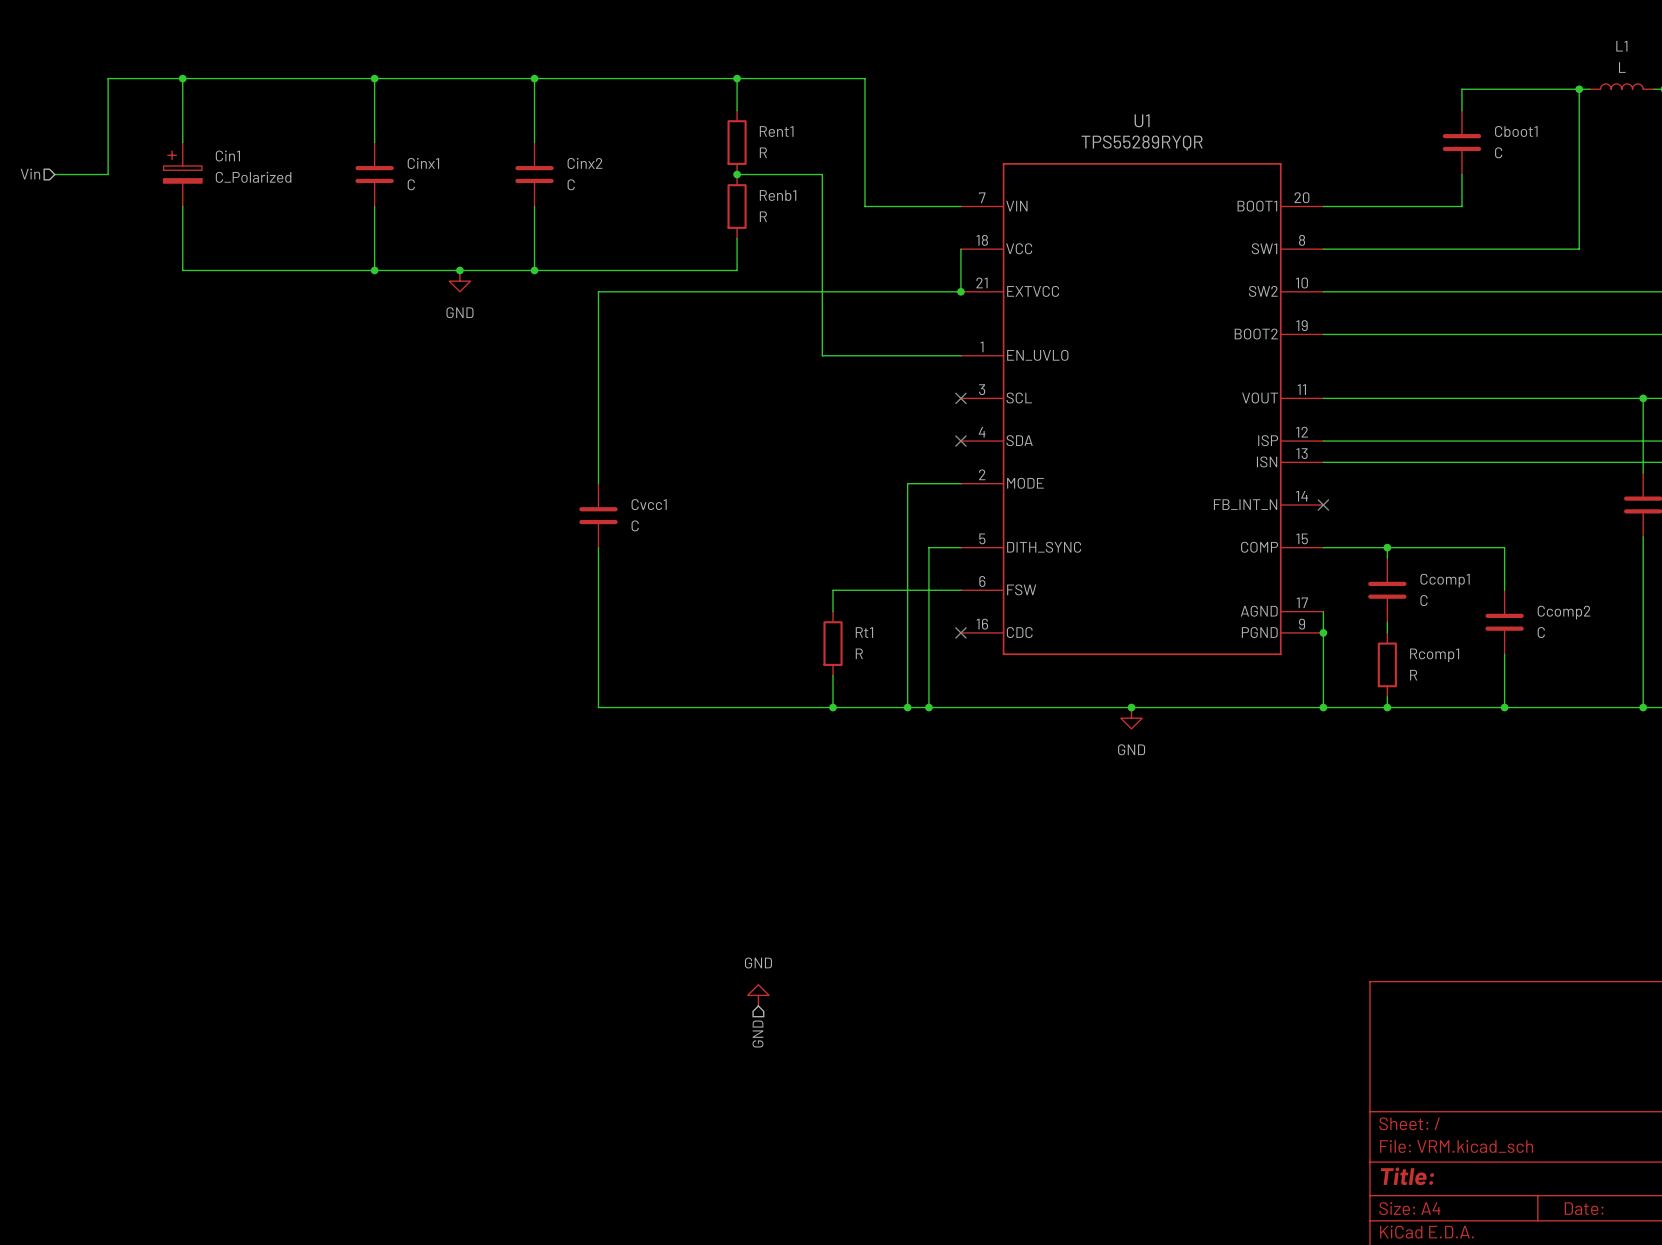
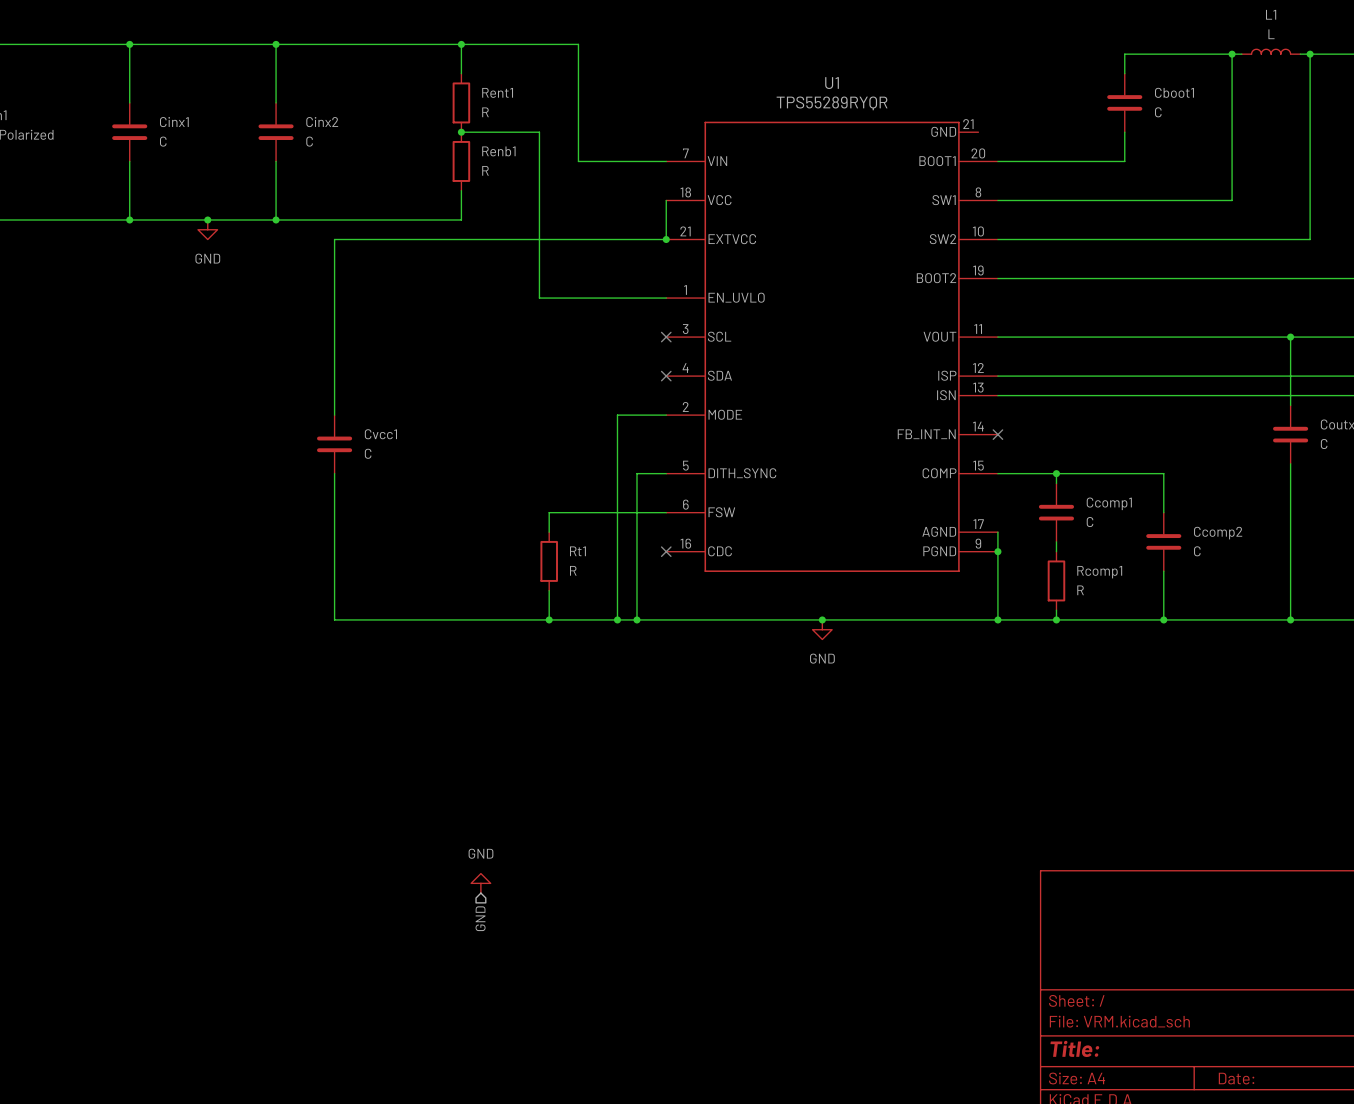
U1 symbol: [960, 163, 1324, 656] -> [666, 121, 998, 572]

